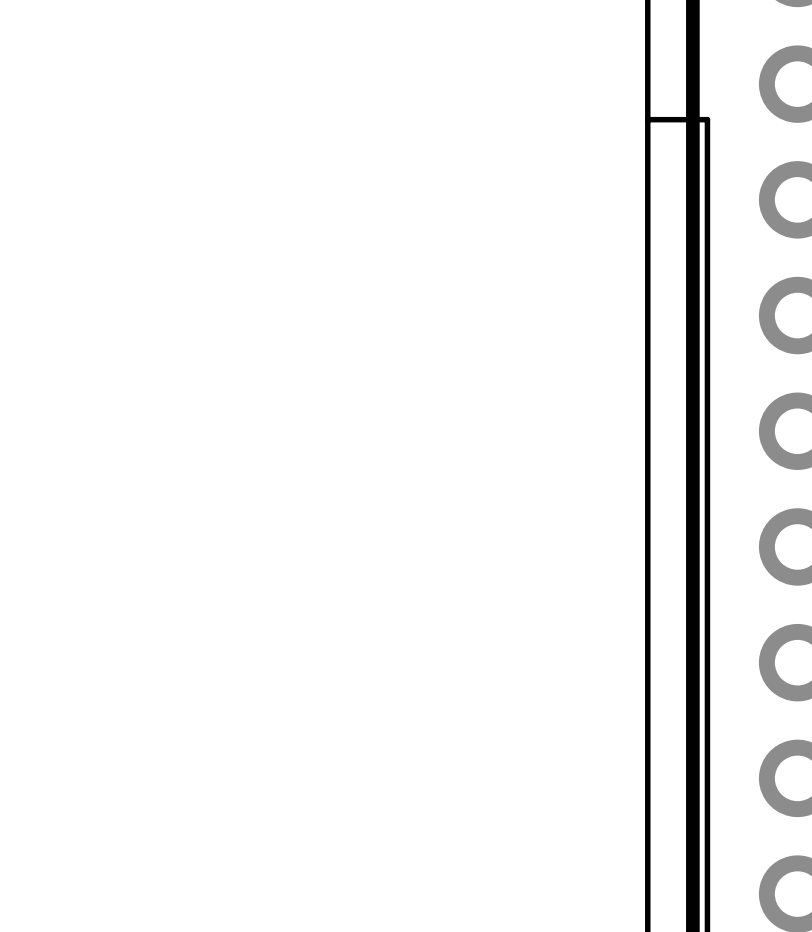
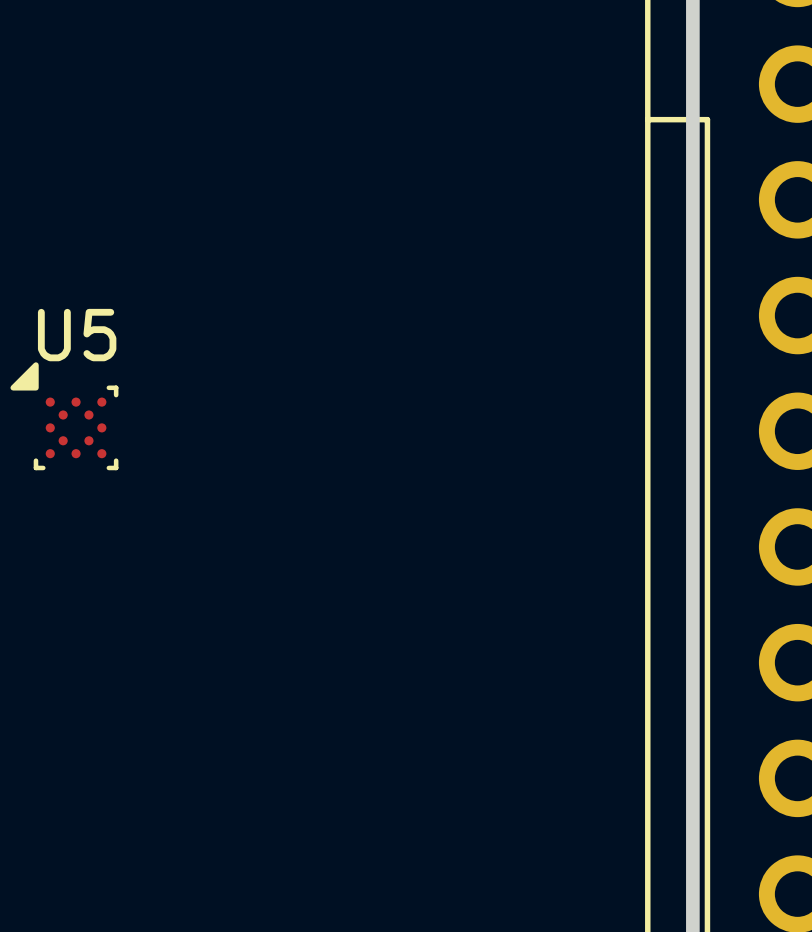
U5: none -> (64, 416)

